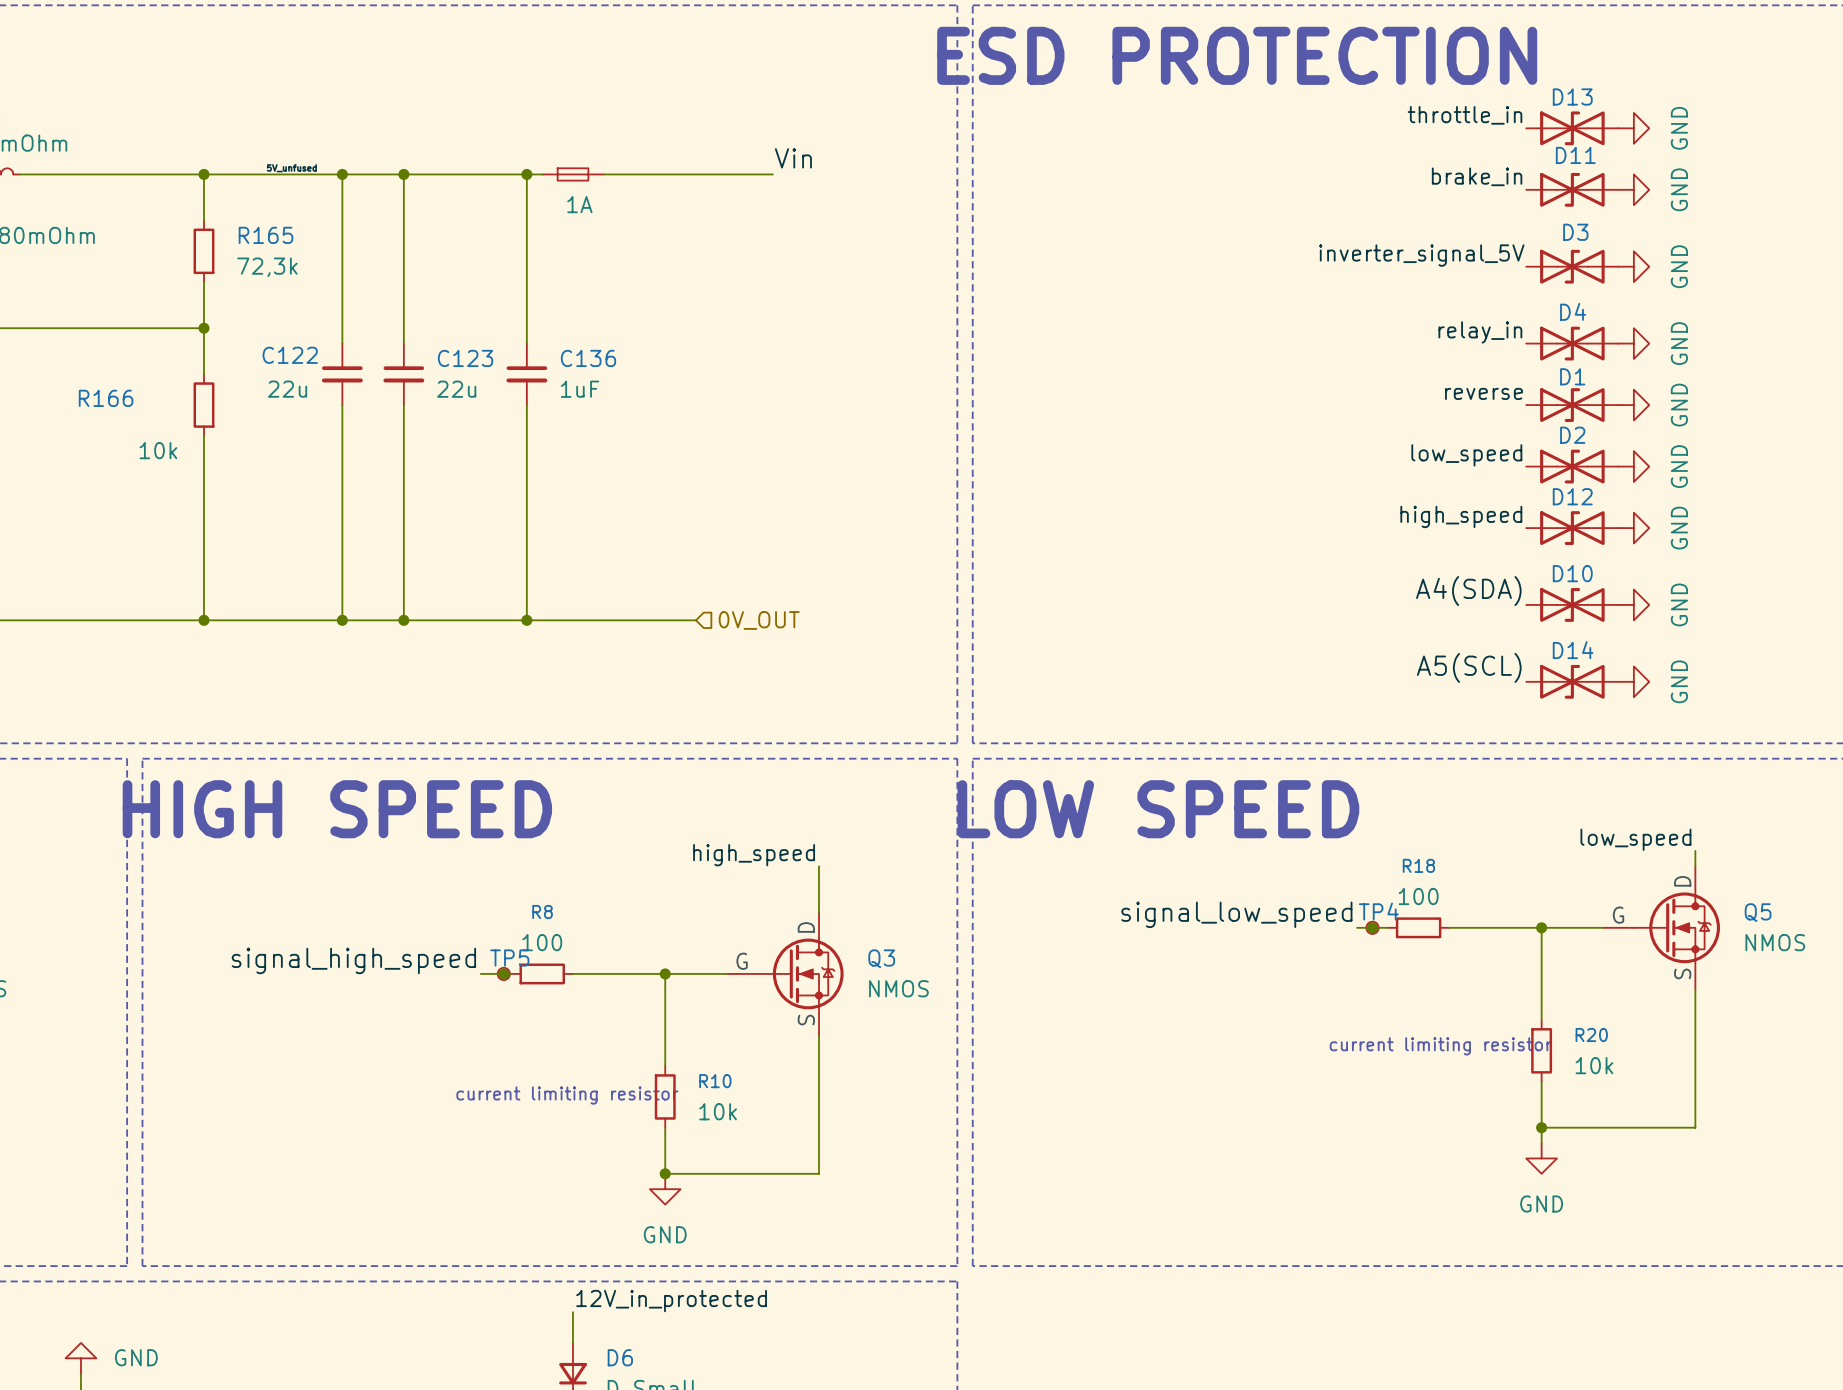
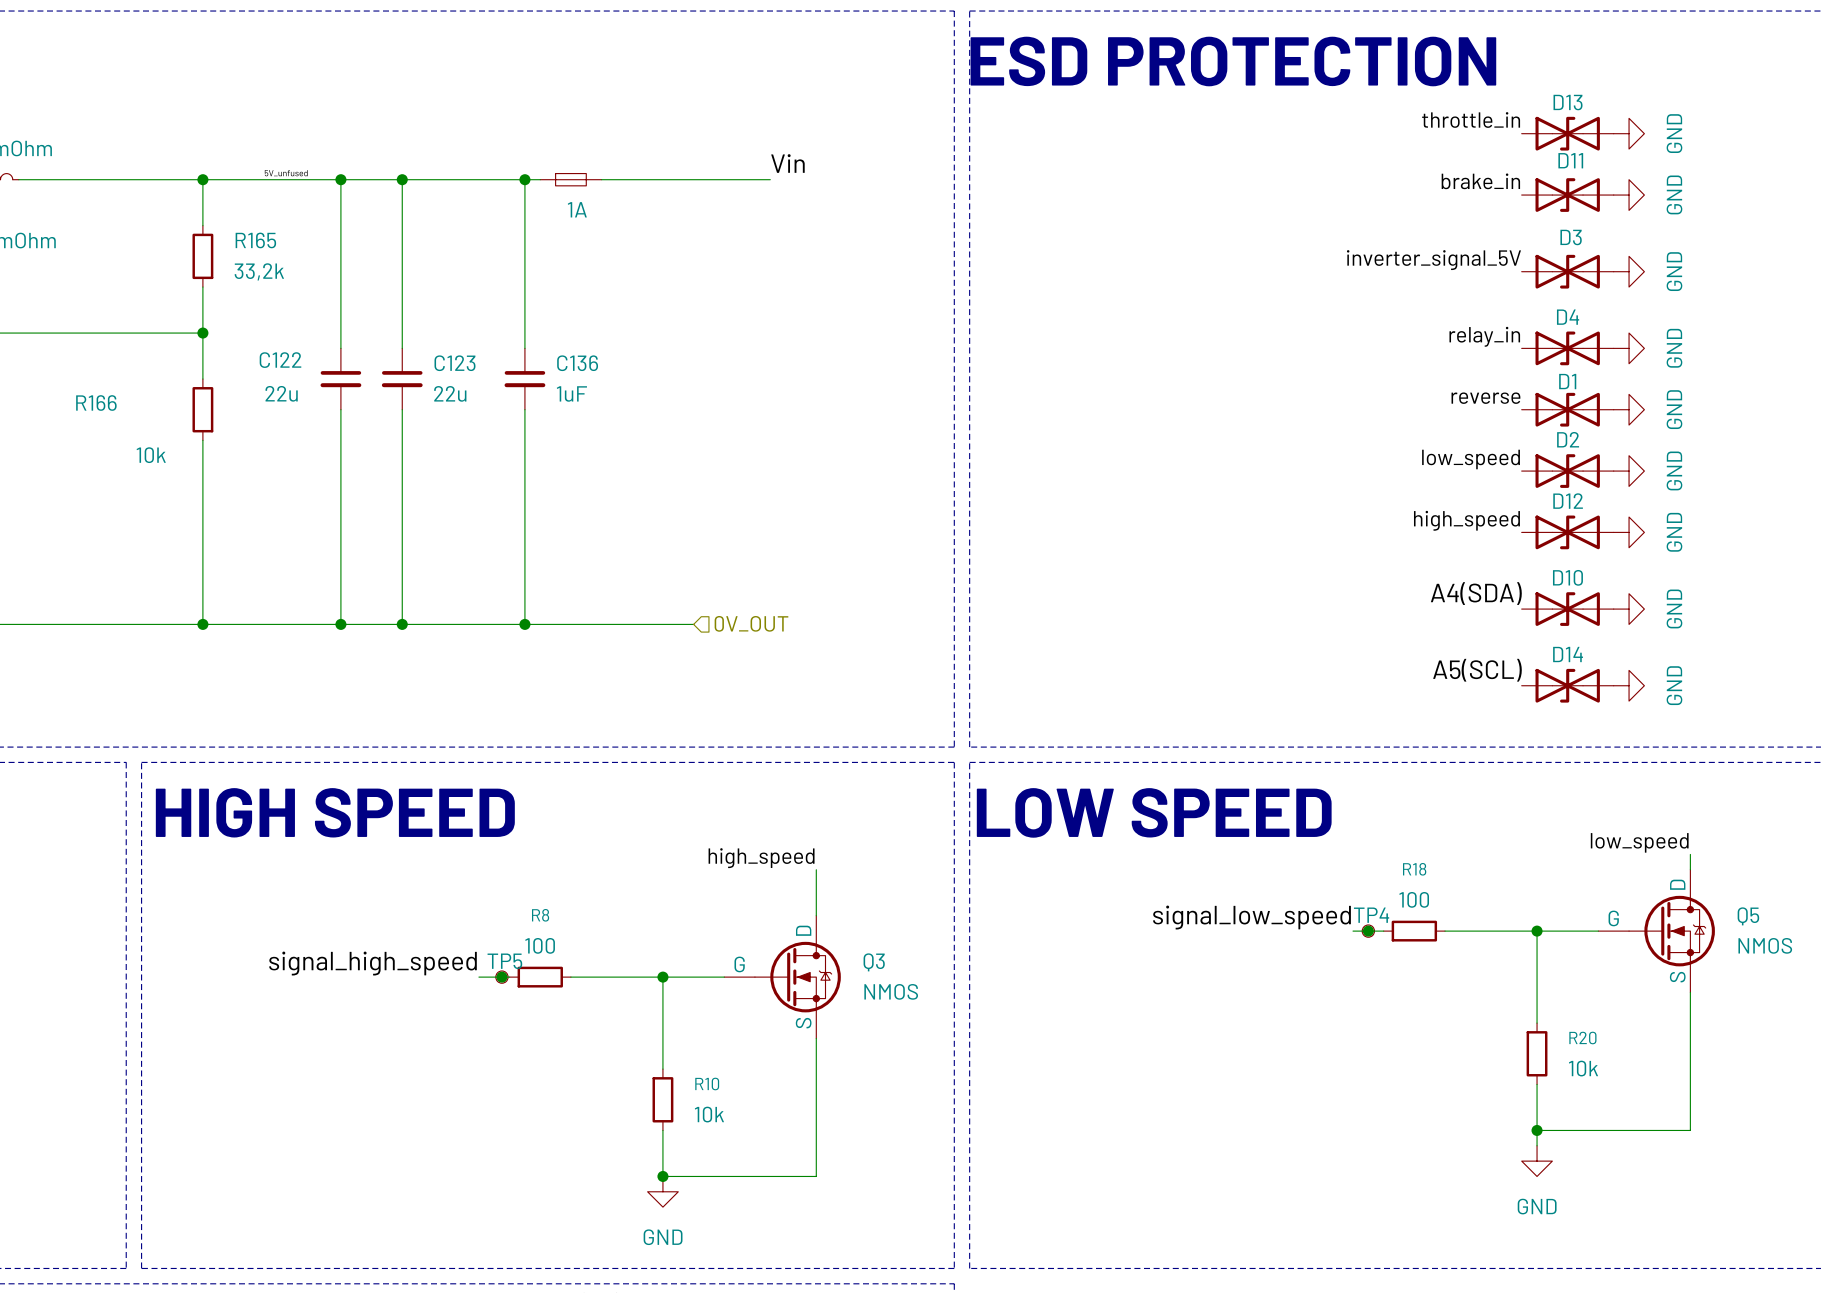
R165 value: 72,3k (267, 267) -> 33,2k (259, 271)
text: current limiting resistor (1440, 1046) -> none
text: current limiting resistor (567, 1095) -> none

